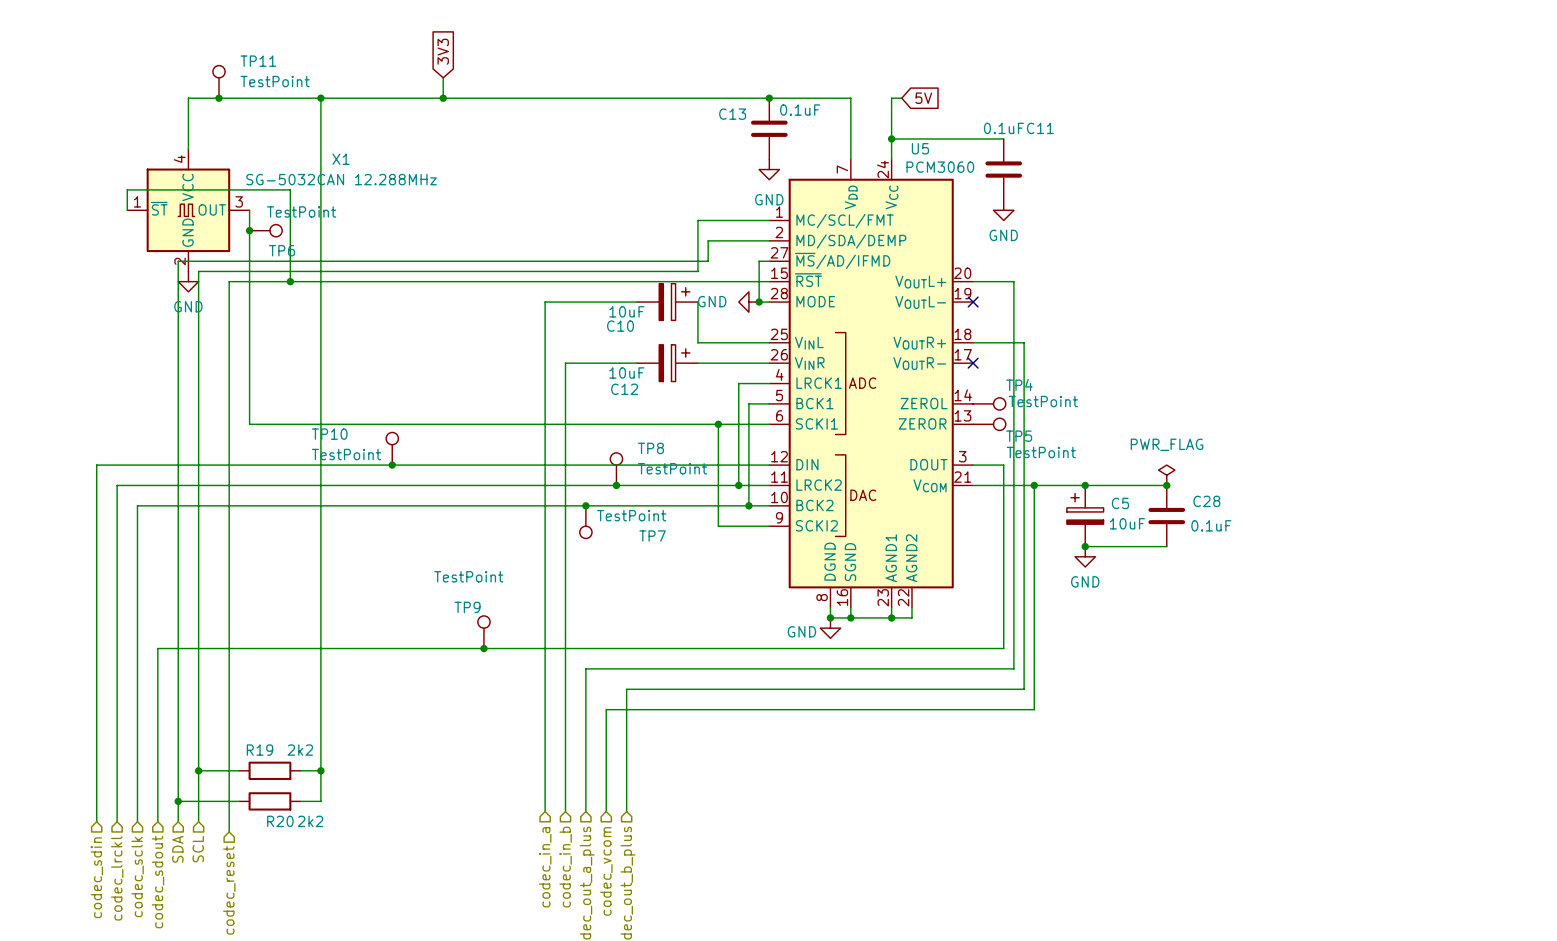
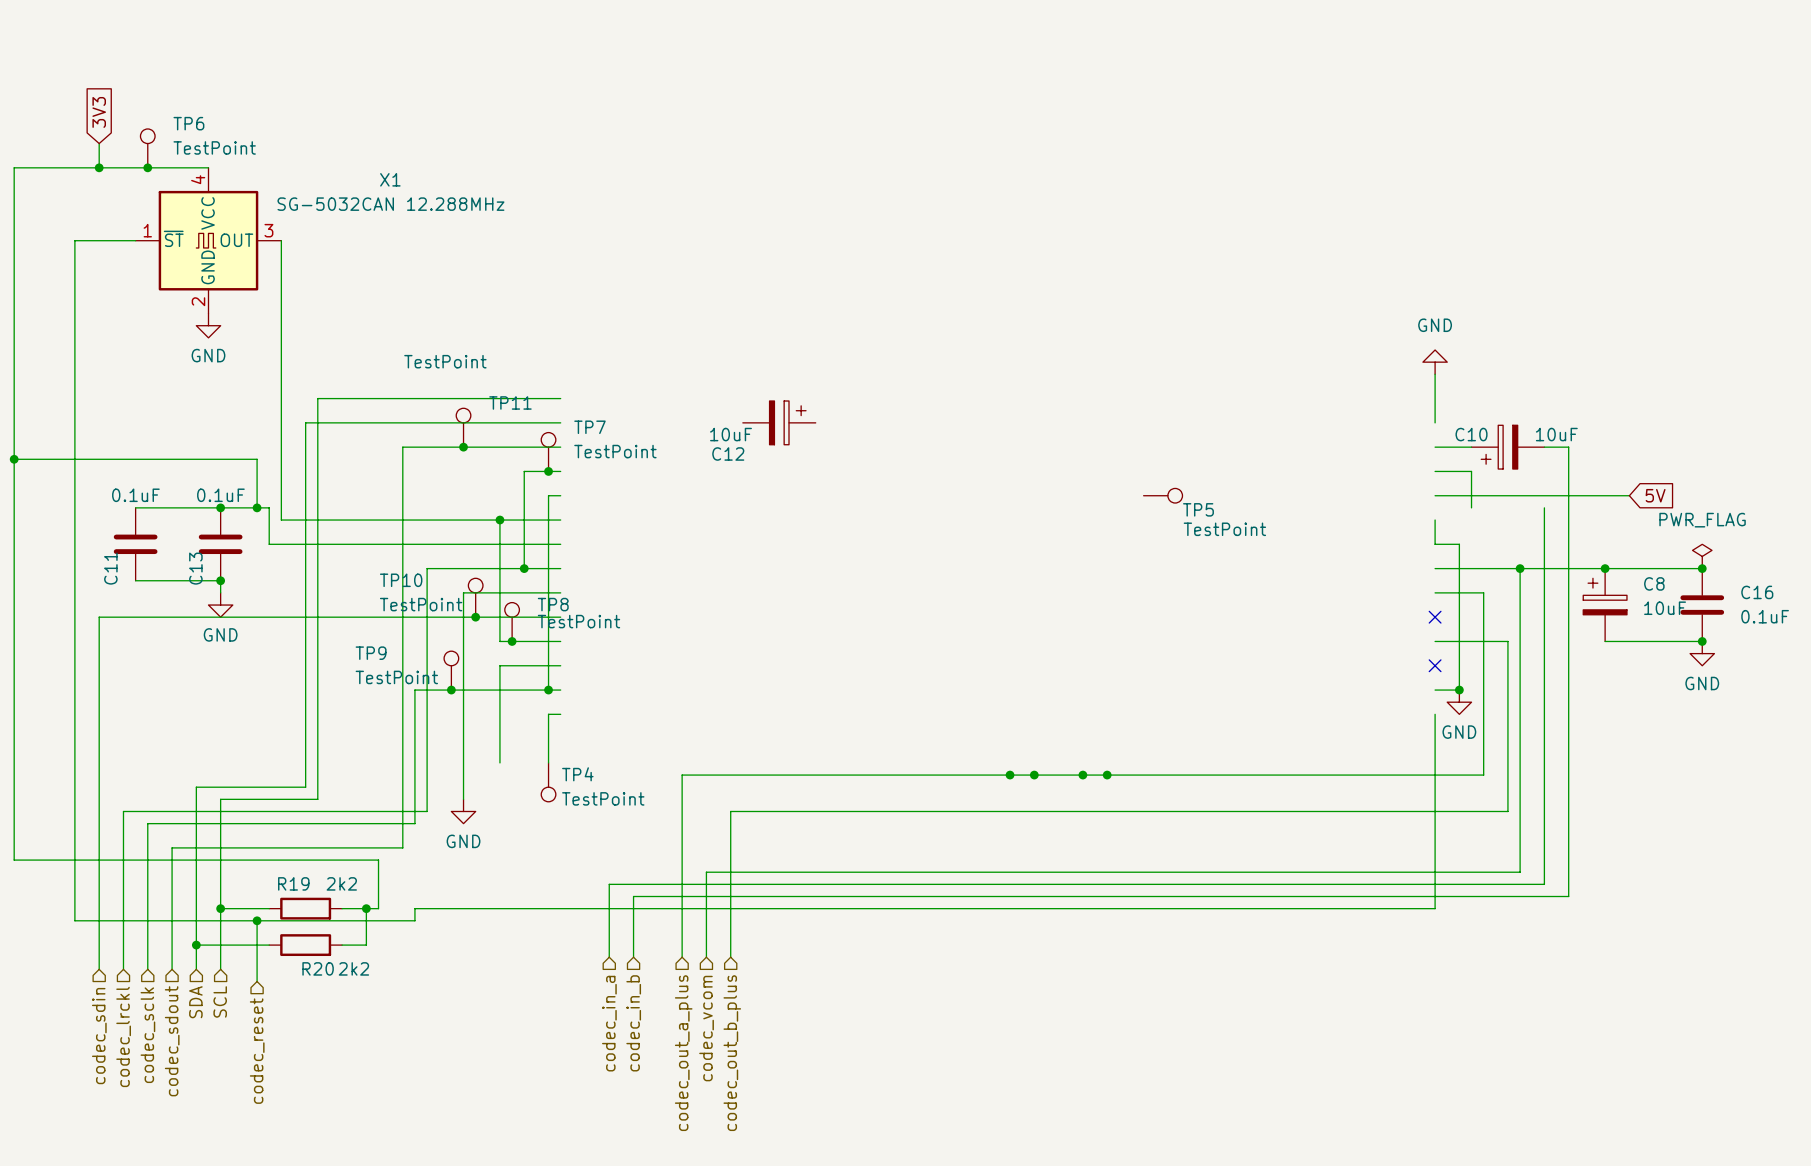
global label: 3V3 (443, 51) -> none
wire: (443, 77) (443, 98) -> none
TP11 position: (219, 81) -> (463, 427)
TP11 value position: TestPoint (275, 81) -> TestPoint (445, 361)
junction: (219, 98) -> none
wire: (320, 98) (320, 770) -> (208, 167) (14, 167) (14, 860) (378, 860) (378, 908) (366, 908)
junction: (320, 98) -> none
junction: (443, 98) -> none
junction: (769, 98) -> none
wire: (901, 98) (891, 98) (891, 159) -> none
global label: 5V (923, 98) -> none
global label: none -> 3V3 (99, 112)
C13 value position: 0.1uF (800, 110) -> 0.1uF (220, 495)
C13 name rotation: 0° (732, 114) -> 90° counterclockwise (195, 568)
C13 name position: C13 (732, 114) -> C13 (195, 568)
wire: none -> (99, 143) (99, 167)
C13 position: (769, 128) -> (220, 544)
C11 name rotation: 0° (1040, 128) -> 90° counterclockwise (110, 568)
C11 name position: C11 (1040, 128) -> C11 (110, 568)
wire: (891, 138) (1003, 138) -> none
junction: (891, 138) -> none
junction: none -> (99, 167)
junction: none -> (147, 167)
wire: (188, 149) (188, 98) (850, 98) (850, 159) -> none
power symbol: GND (769, 169) -> none
C11 position: (1003, 169) -> (135, 544)
wire: (127, 210) (127, 189) (290, 189) (290, 281) -> (135, 240) (74, 240) (74, 920) (414, 920) (414, 908) (1435, 908) (1435, 714)
power symbol: GND (1003, 210) -> none
TP6 value position: TestPoint (301, 211) -> TestPoint (214, 147)
wire: (769, 220) (697, 220) (697, 271) (198, 271) (198, 495) -> (135, 580) (220, 580)
junction: (249, 230) -> none
TP6 position: (265, 230) -> (147, 148)
TP6 rotation: 0° (276, 230) -> 90° counterclockwise (147, 136)
wire: (769, 240) (708, 240) (708, 261) (178, 261) (178, 668) -> (560, 422) (305, 422) (305, 787) (196, 787)
TP6 name position: TP6 (282, 250) -> TP6 (188, 123)
wire: (769, 261) (759, 261) (759, 302) (769, 302) -> none
junction: (290, 281) -> none
wire: (769, 281) (229, 281) (229, 393) -> (14, 459) (257, 459)
wire: (973, 281) (1013, 281) (1013, 668) (585, 668) -> (1435, 592) (1483, 592) (1483, 775) (682, 775) (682, 787)
wire: (636, 302) (545, 302) (545, 760) -> (1544, 447) (1568, 447) (1568, 896) (633, 896)
C10 position: (667, 302) -> (1507, 447)
C10 rotation: 0° (674, 302) -> 180° (1499, 447)
wire: (697, 302) (697, 342) (769, 342) -> none
power symbol: GND (748, 302) -> none
junction: (759, 302) -> none
no-connect mark: (973, 302) -> none
power symbol: none -> GND (1435, 362)
wire: none -> (1435, 374) (1435, 422)
C10 name position: C10 (620, 326) -> C10 (1471, 434)
wire: (973, 342) (1024, 342) (1024, 689) -> (1435, 641) (1507, 641) (1507, 811) (1204, 811)
wire: (636, 363) (565, 363) (565, 811) -> none
wire: (697, 363) (769, 363) -> none
no-connect mark: (973, 363) -> none
junction: none -> (463, 447)
wire: (769, 383) (738, 383) (738, 485) -> none
U5: PCM3060 (871, 383) -> none
wire: none -> (1435, 447) (1471, 447)
junction: none -> (14, 459)
TP4 value position: TestPoint (1043, 401) -> TestPoint (603, 798)
junction: none -> (548, 471)
wire: none -> (560, 471) (524, 471) (524, 568)
wire: (769, 403) (748, 403) (748, 505) -> none
TP4 position: (989, 403) -> (548, 782)
TP4 rotation: 0° (999, 403) -> 90° clockwise (548, 794)
wire: none -> (1435, 471) (1471, 471) (1471, 507)
wire: (249, 424) (473, 424) -> (281, 495) (281, 520) (560, 520)
wire: none -> (548, 495) (548, 690)
wire: (483, 424) (769, 424) -> none
wire: (718, 424) (718, 526) (769, 526) -> none
junction: (718, 424) -> none
wire: none -> (1435, 495) (1629, 495)
global label: none -> 5V (1655, 495)
junction: none -> (220, 507)
wire: (229, 434) (229, 781) -> none
junction: none -> (257, 507)
wire: none -> (1544, 507) (1544, 884) (609, 884) (609, 957)
wire: none -> (499, 520) (499, 641) (560, 641)
junction: none -> (499, 520)
wire: none -> (1435, 520) (1435, 544) (1459, 544) (1459, 690) (1435, 690)
TP10 position: (392, 448) -> (475, 597)
TP8 name position: TP8 (650, 448) -> TP8 (553, 604)
wire: (239, 465) (96, 465) (96, 526) -> (269, 544) (269, 507) (135, 507)
junction: (392, 465) -> none
wire: (483, 465) (769, 465) -> none
wire: (973, 465) (1003, 465) (1003, 648) (157, 648) (157, 719) -> (560, 447) (402, 447) (402, 847) (172, 847)
TP8 position: (616, 469) -> (512, 622)
power symbol: PWR_FLAG (1166, 475) -> none
power symbol: none -> PWR_FLAG (1702, 556)
wire: (371, 485) (117, 485) (117, 689) -> (427, 568) (427, 811) (123, 811)
junction: none -> (524, 568)
wire: (483, 485) (769, 485) -> none
junction: (616, 485) -> none
junction: (738, 485) -> none
wire: (973, 485) (1166, 485) -> none
wire: (1034, 485) (1034, 709) (606, 709) (606, 740) -> (1520, 568) (1520, 872) (706, 872)
junction: (1034, 485) -> none
junction: (1085, 485) -> none
junction: (1166, 485) -> none
wire: none -> (1435, 568) (1702, 568)
junction: none -> (1520, 568)
junction: none -> (1605, 568)
junction: none -> (1702, 568)
junction: none -> (220, 580)
wire: (198, 505) (198, 679) -> (560, 398) (317, 398) (317, 799) (220, 799)
wire: (402, 505) (137, 505) (137, 699) -> (560, 690) (414, 690) (414, 823) (147, 823)
wire: none -> (463, 592) (463, 799)
wire: (483, 505) (769, 505) -> none
junction: (585, 505) -> none
junction: (748, 505) -> none
TP7 value position: TestPoint (631, 515) -> TestPoint (615, 451)
power symbol: none -> GND (220, 605)
C5: 10uF (1085, 516) -> none
C28: 0.1uF (1166, 516) -> none
C8: none -> 10uF (1605, 605)
C16: none -> 0.1uF (1702, 605)
TP7 position: (585, 522) -> (548, 452)
wire: none -> (99, 617) (560, 617)
junction: none -> (475, 617)
no-connect mark: none -> (1435, 617)
TP7 rotation: 0° (585, 532) -> 180° (548, 439)
TP7 name position: TP7 (652, 536) -> TP7 (589, 427)
junction: none -> (512, 641)
wire: (1085, 546) (1166, 546) -> none
junction: (1085, 546) -> none
wire: none -> (1605, 641) (1702, 641)
junction: none -> (1702, 641)
power symbol: GND (1085, 556) -> none
power symbol: none -> GND (1702, 653)
wire: none -> (560, 665) (499, 665) (499, 762)
no-connect mark: none -> (1435, 665)
TP9 value position: TestPoint (468, 576) -> TestPoint (396, 677)
junction: none -> (451, 690)
junction: none -> (548, 690)
junction: none -> (1459, 690)
power symbol: none -> GND (1459, 702)
TP9 name position: TP9 (467, 607) -> TP9 (371, 653)
wire: none -> (560, 714) (548, 714) (548, 762)
wire: (830, 607) (830, 617) (911, 617) (911, 607) -> none
wire: (850, 607) (850, 617) -> none
wire: (891, 607) (891, 617) -> none
junction: (830, 617) -> none
junction: (850, 617) -> none
junction: (891, 617) -> none
power symbol: GND (830, 628) -> none
TP9 position: (483, 632) -> (451, 670)
junction: (483, 648) -> none
junction: none -> (1010, 775)
junction: none -> (1034, 775)
junction: none -> (1082, 775)
junction: none -> (1107, 775)
power symbol: none -> GND (463, 811)
junction: none -> (257, 920)
hierarchical label: none -> codec_in_a (609, 1023)
hierarchical label: codec_in_a (545, 867) -> codec_in_b (633, 1023)
hierarchical label: codec_in_b (565, 867) -> none

